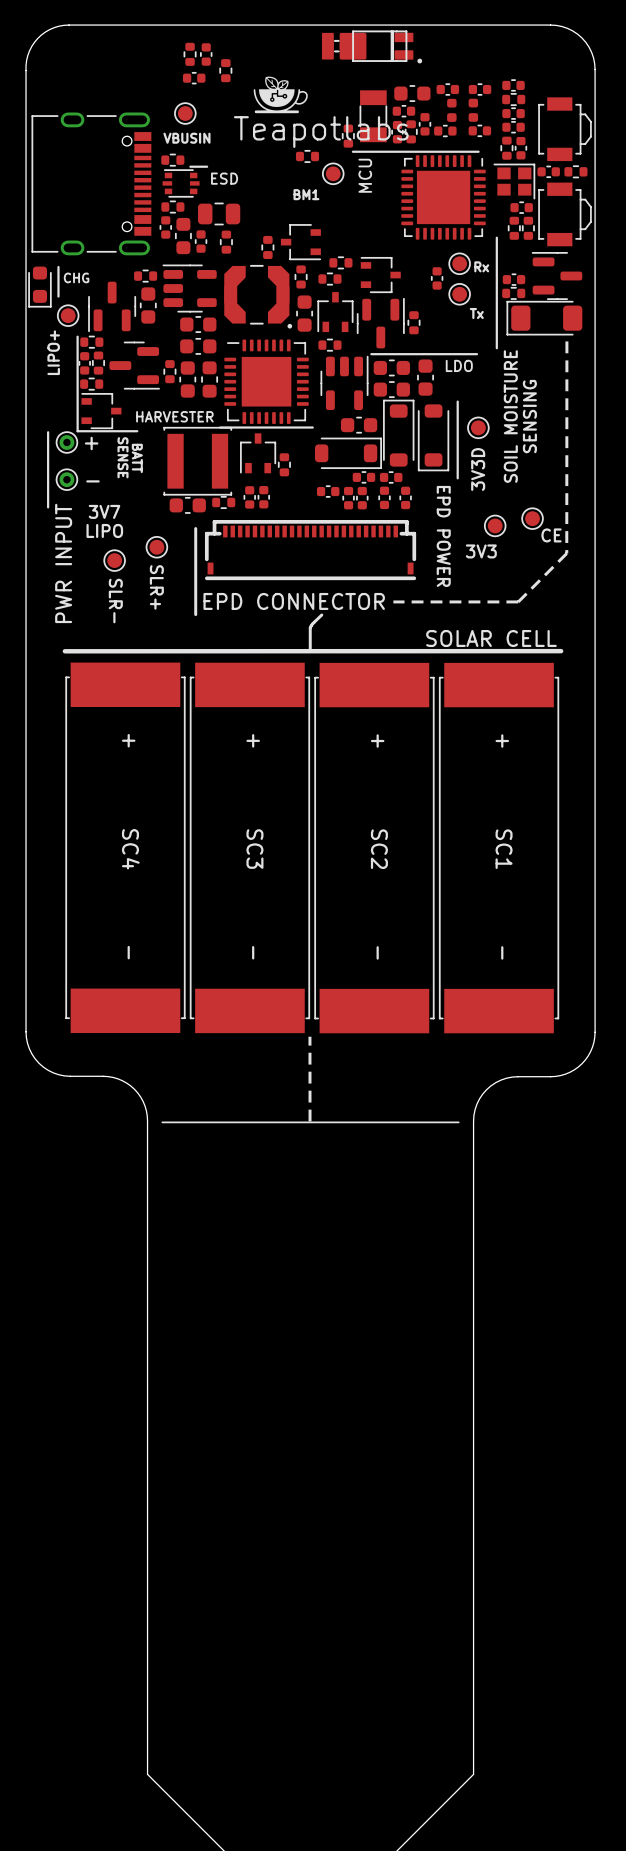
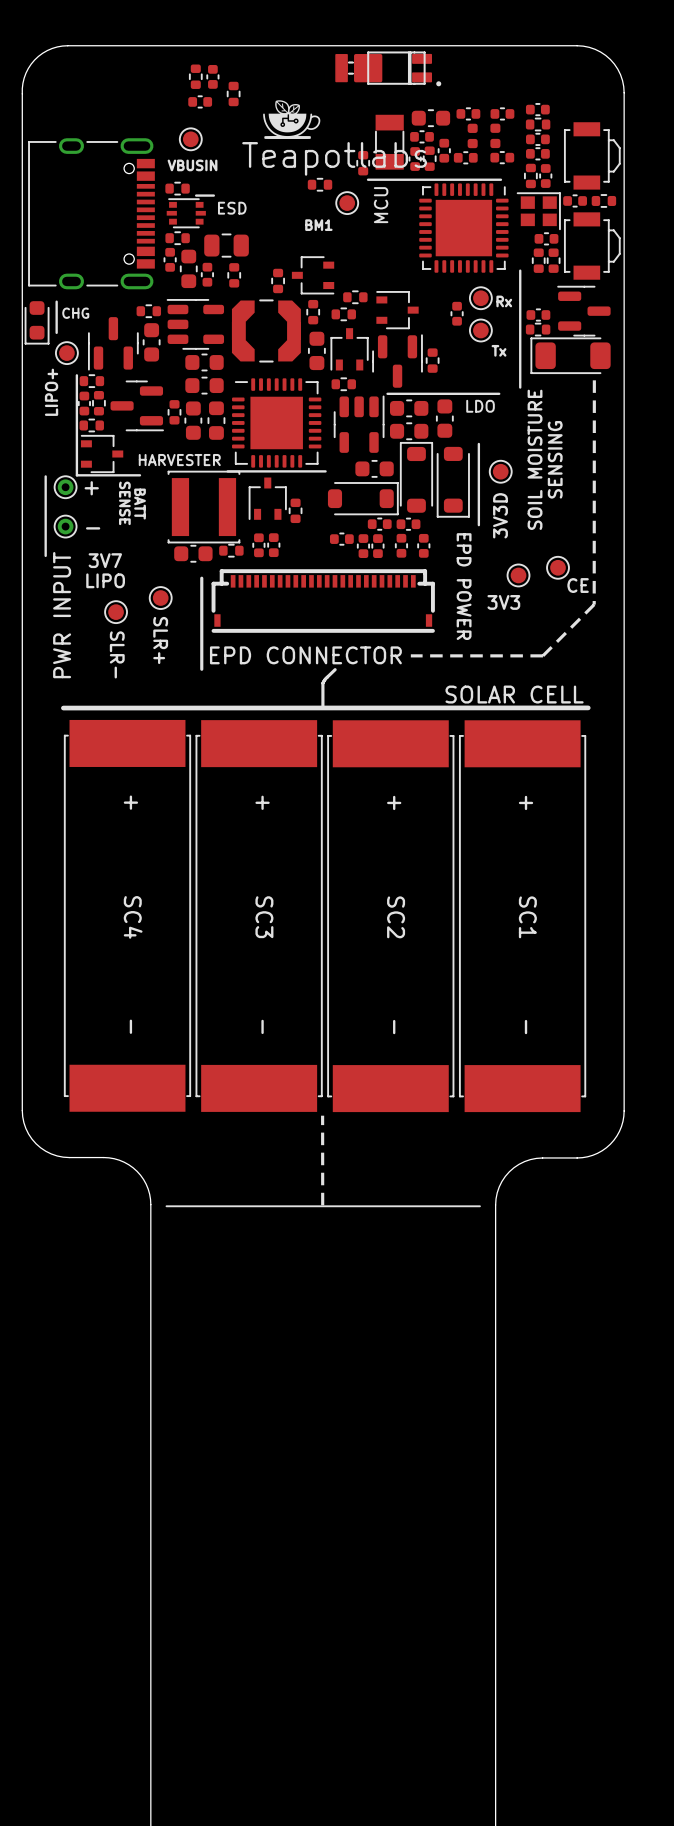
drawing: [287, 323, 293, 329] -> none

